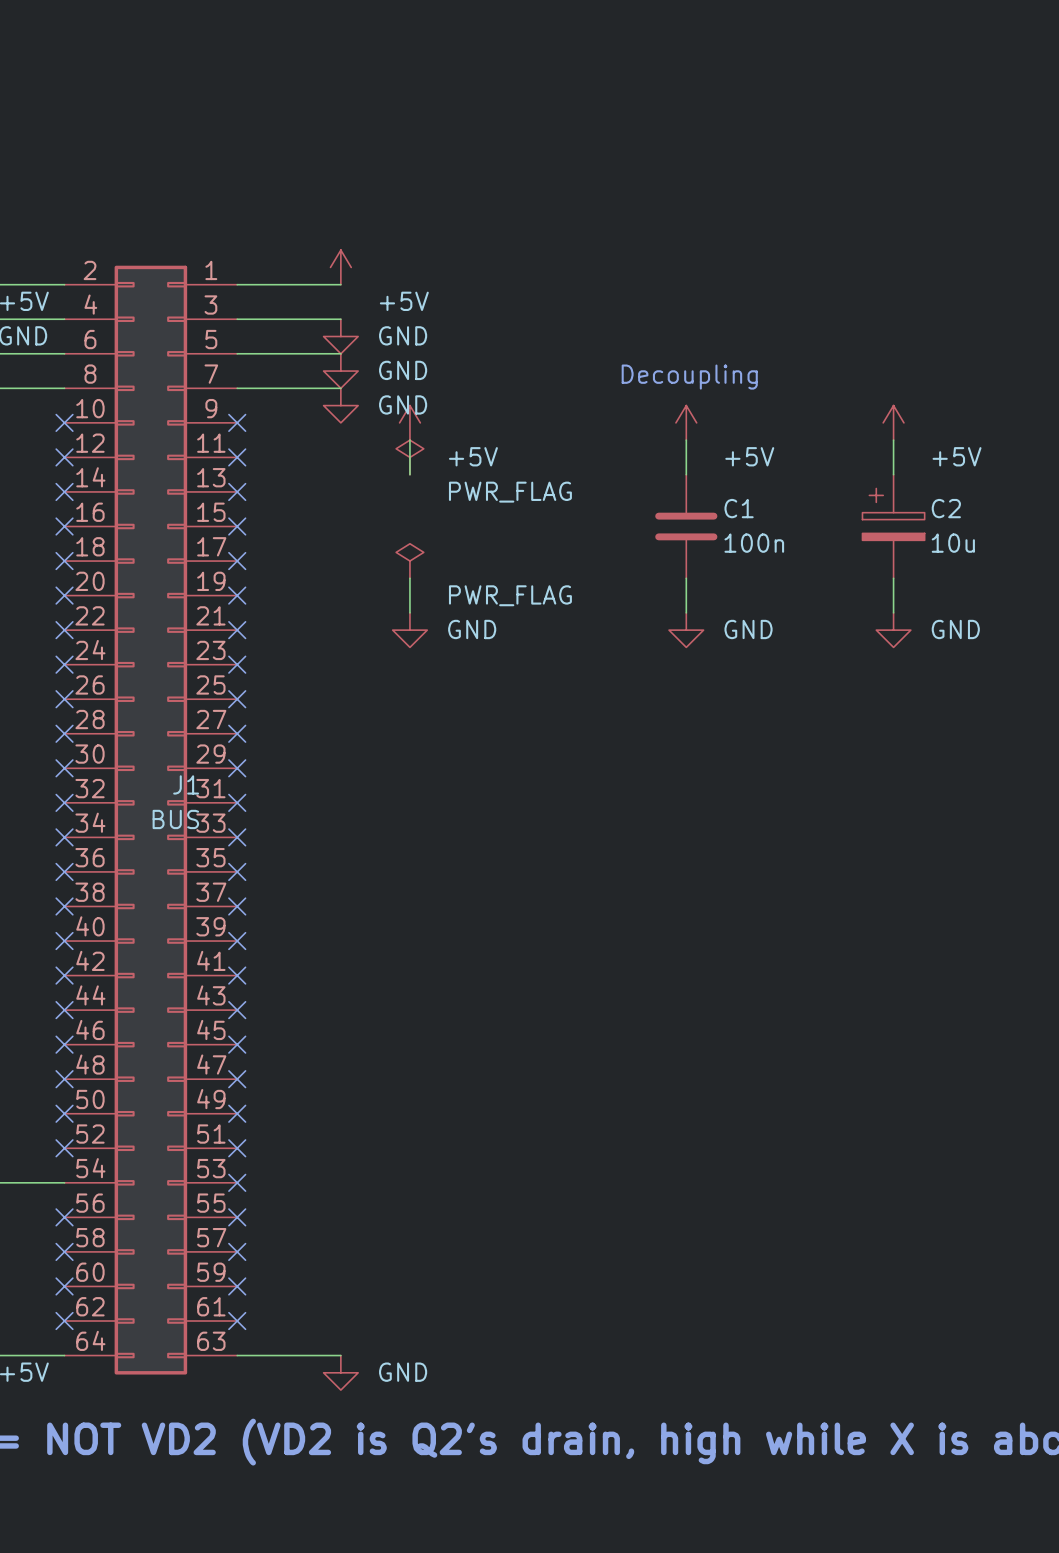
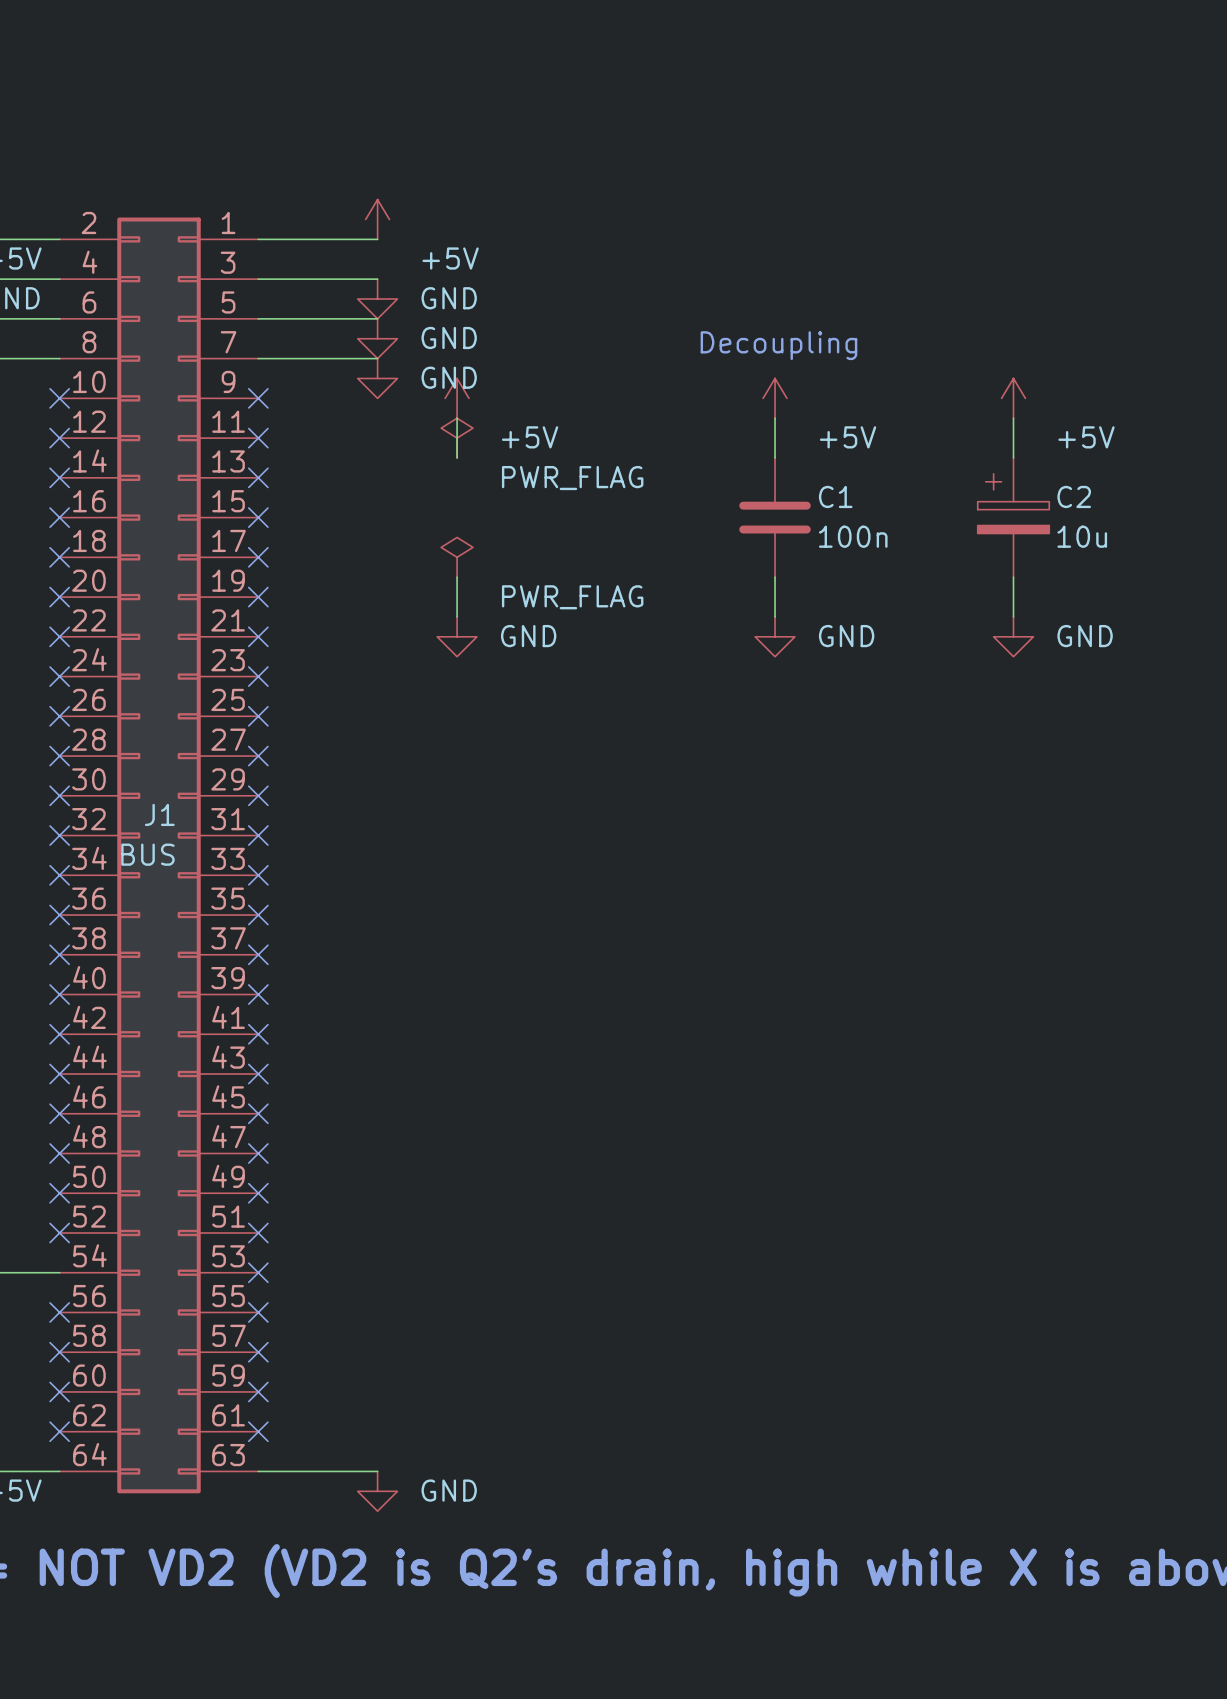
J1 name position: J1 (186, 784) -> J1 (159, 814)
J1 value position: BUS (175, 819) -> BUS (147, 854)

